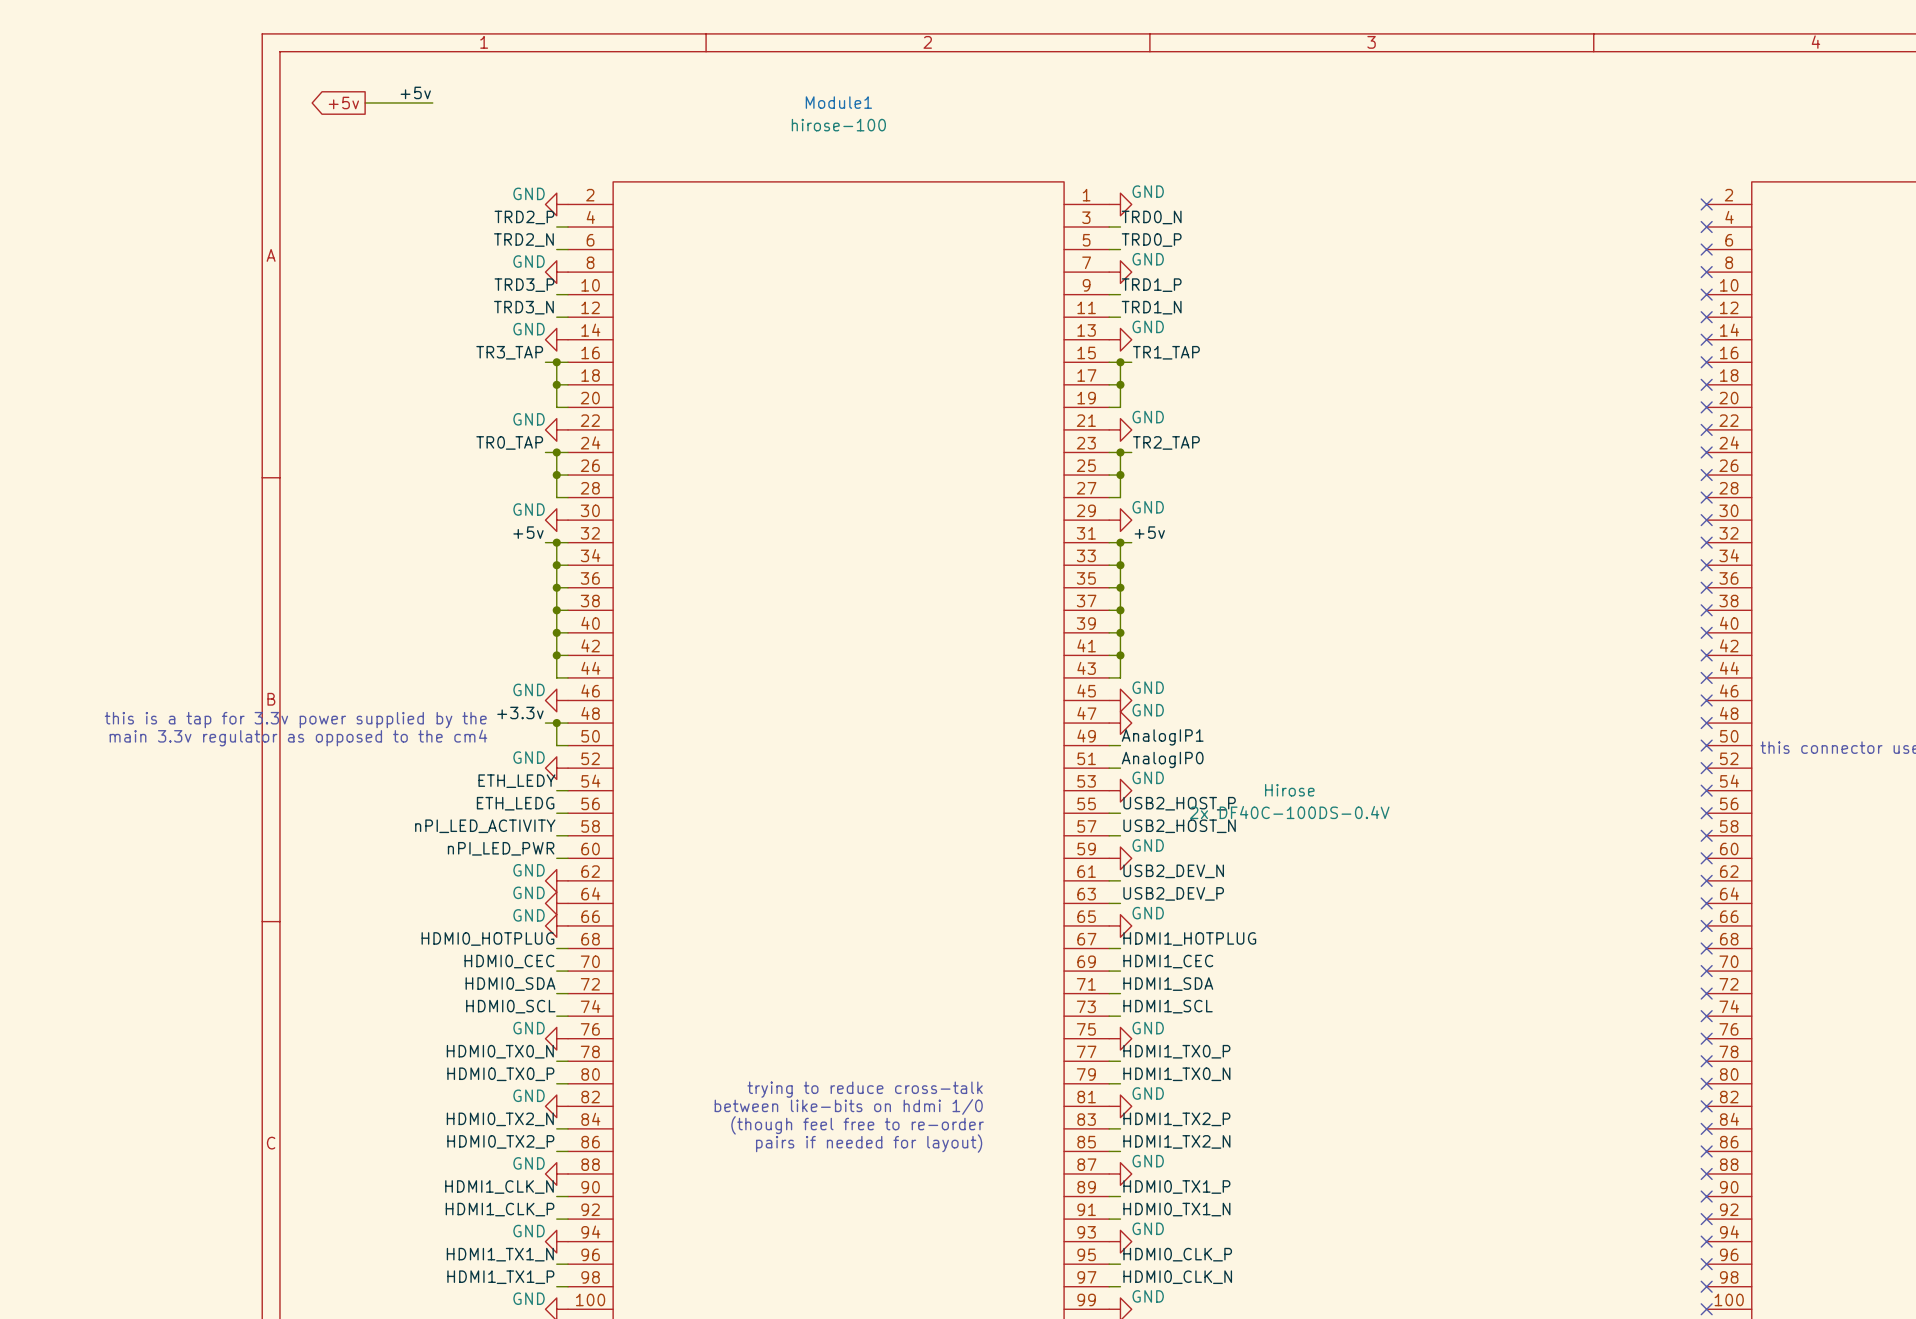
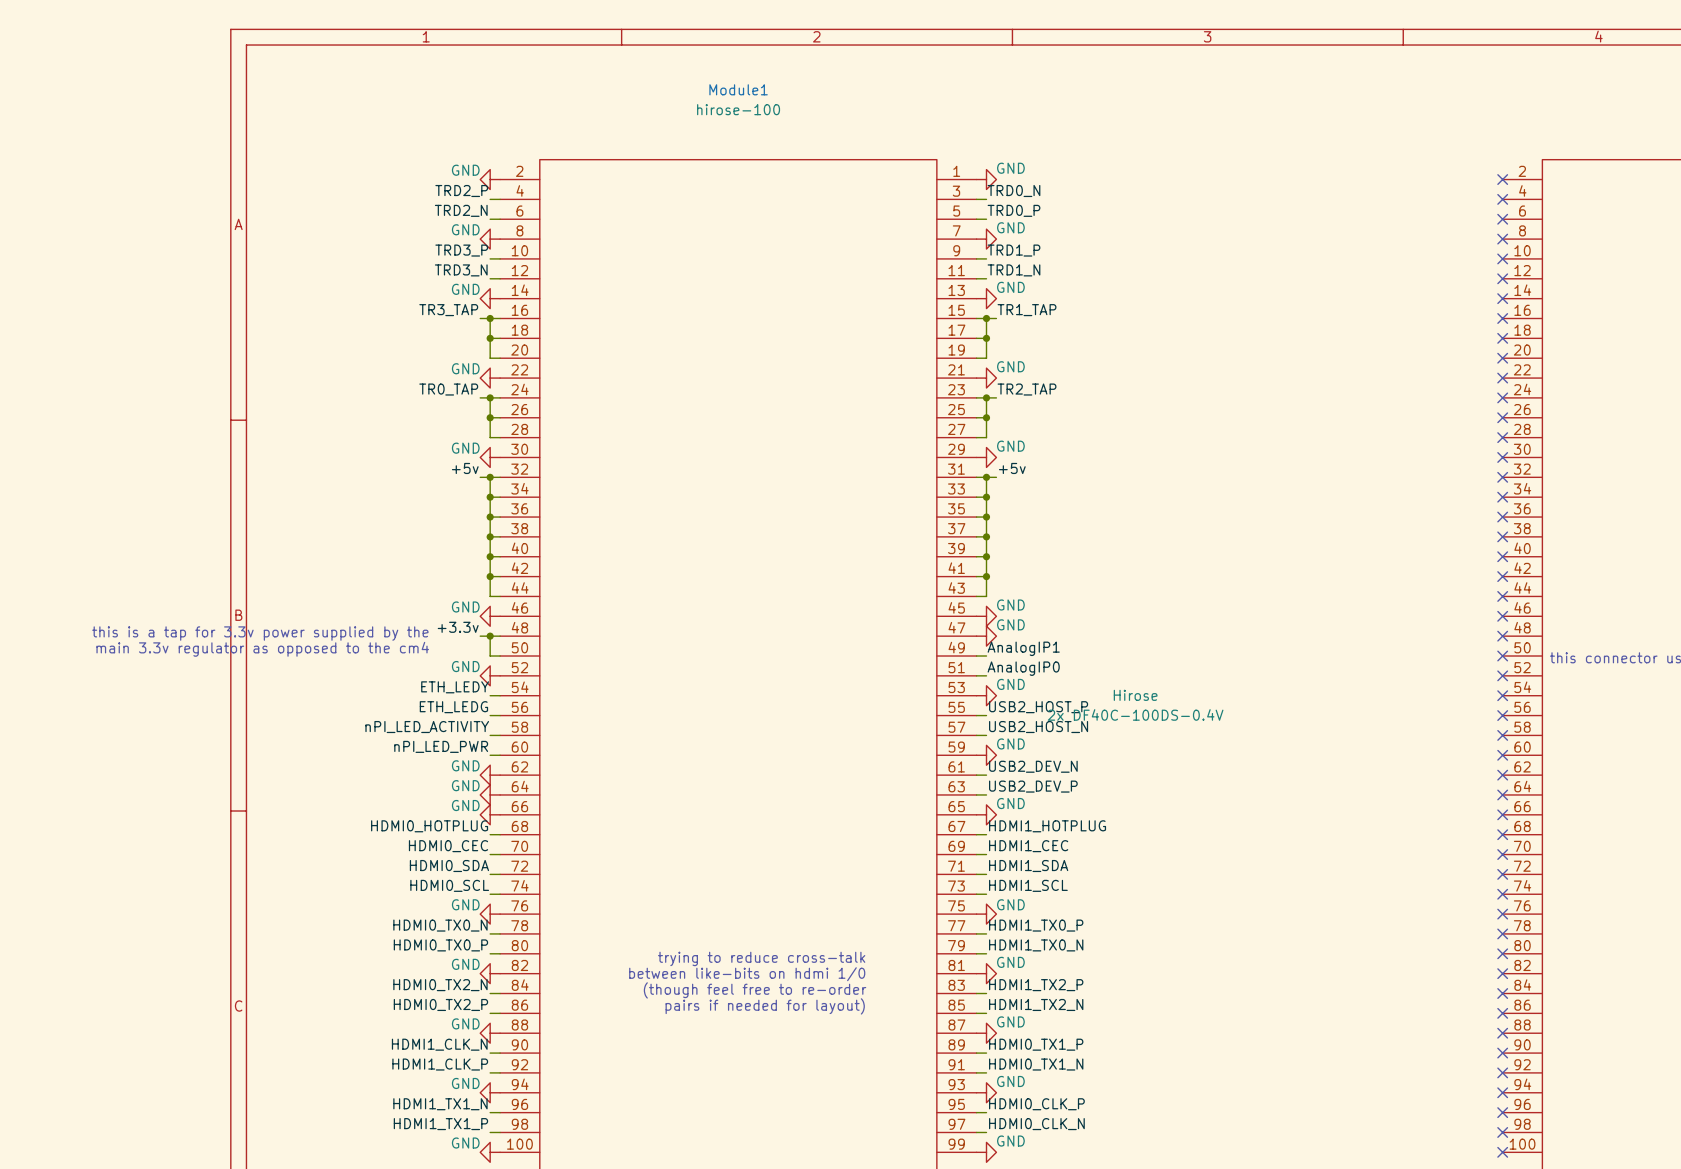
label: +5v (415, 92) -> none
global label: +5v (343, 102) -> none
wire: (365, 102) (432, 102) -> none

